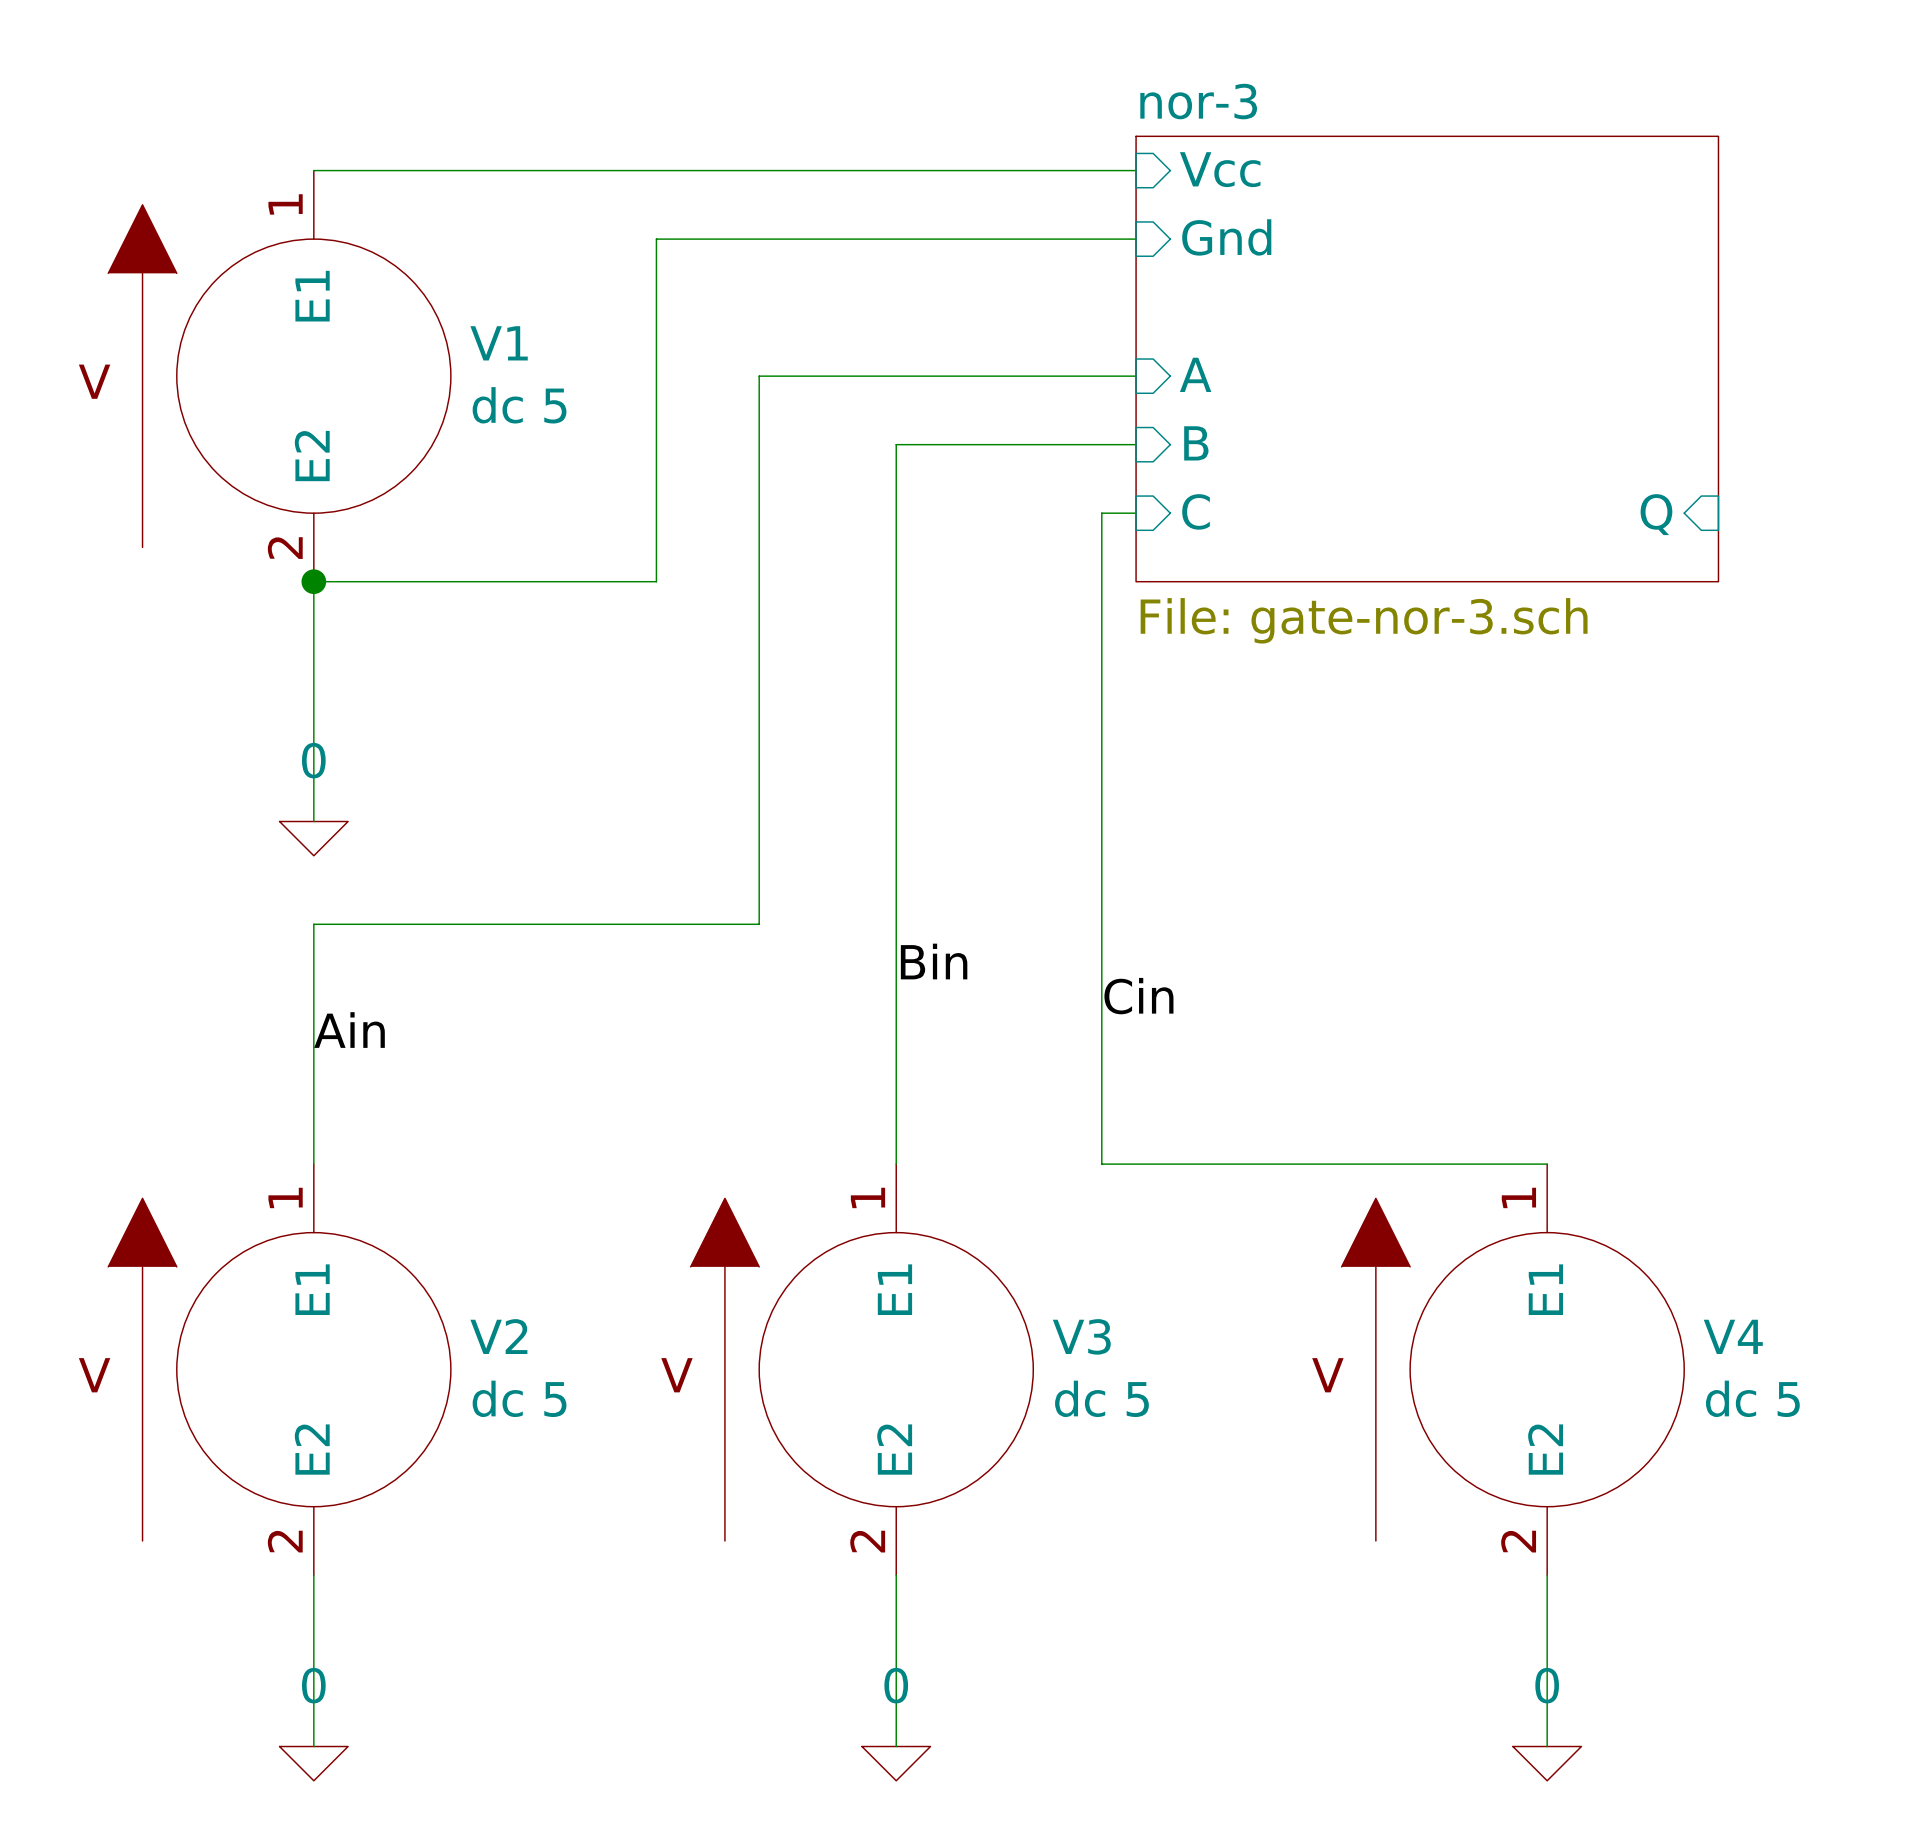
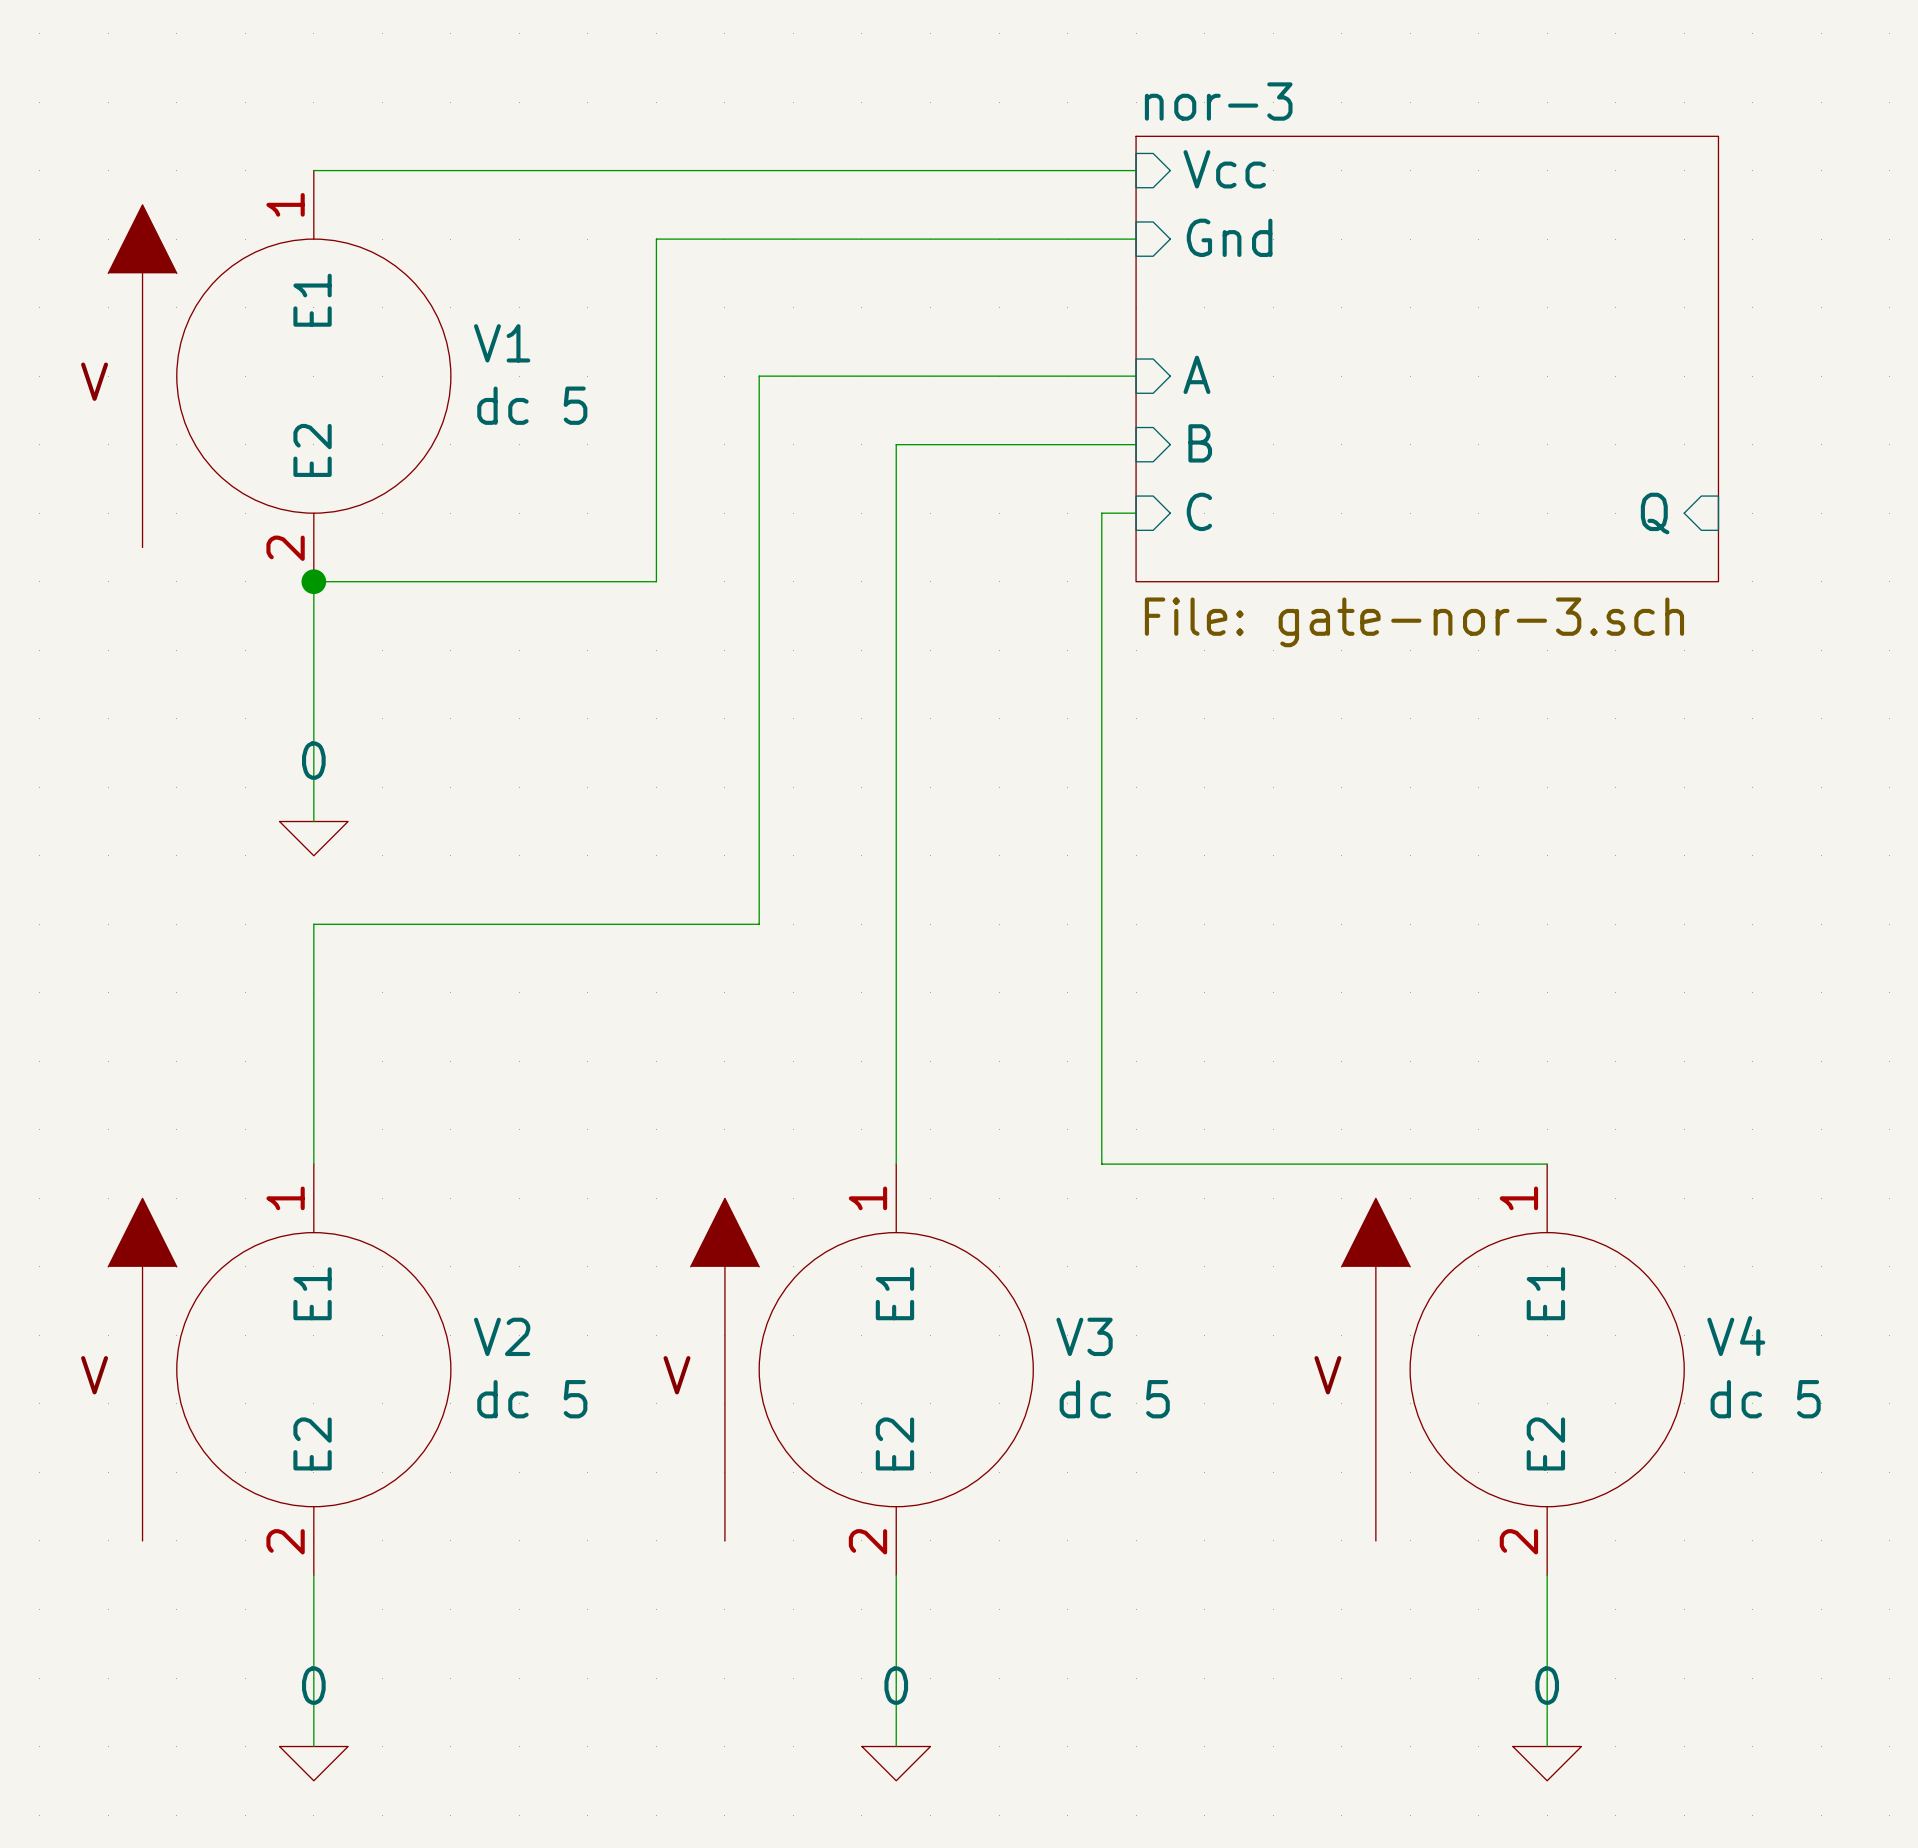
label: Bin (934, 961) -> none
label: Cin (1138, 996) -> none
label: Ain (349, 1030) -> none

